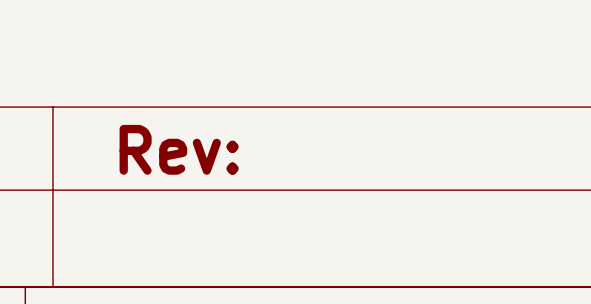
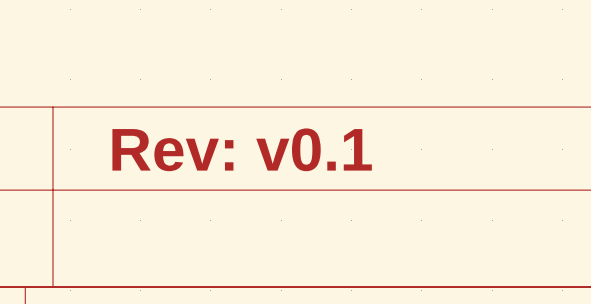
title block: Rev: (179, 149) -> Rev: v0.1 (242, 149)

